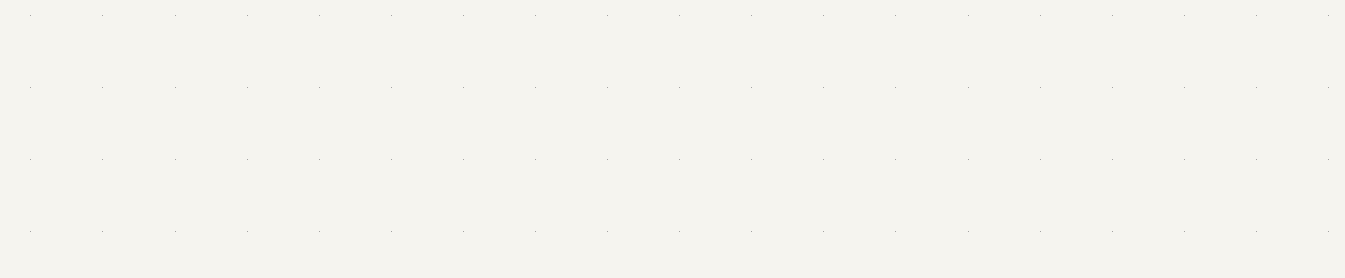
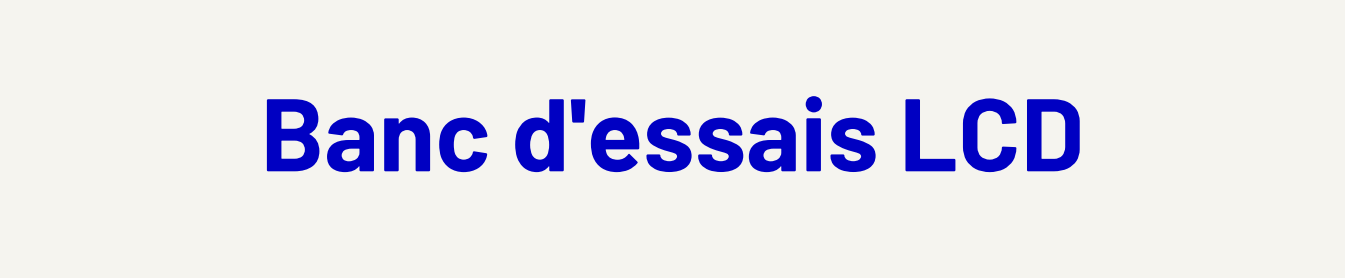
text: none -> Banc d'essais LCD (673, 134)

